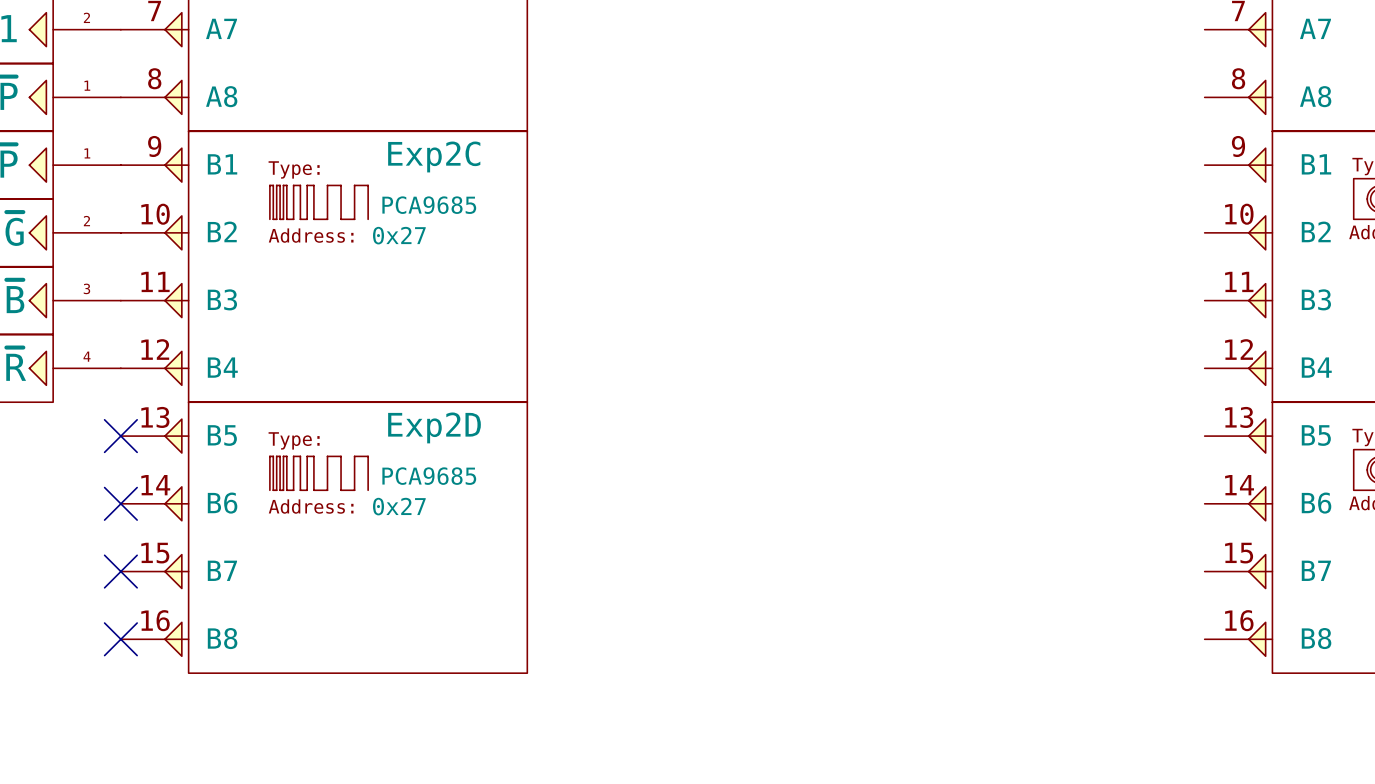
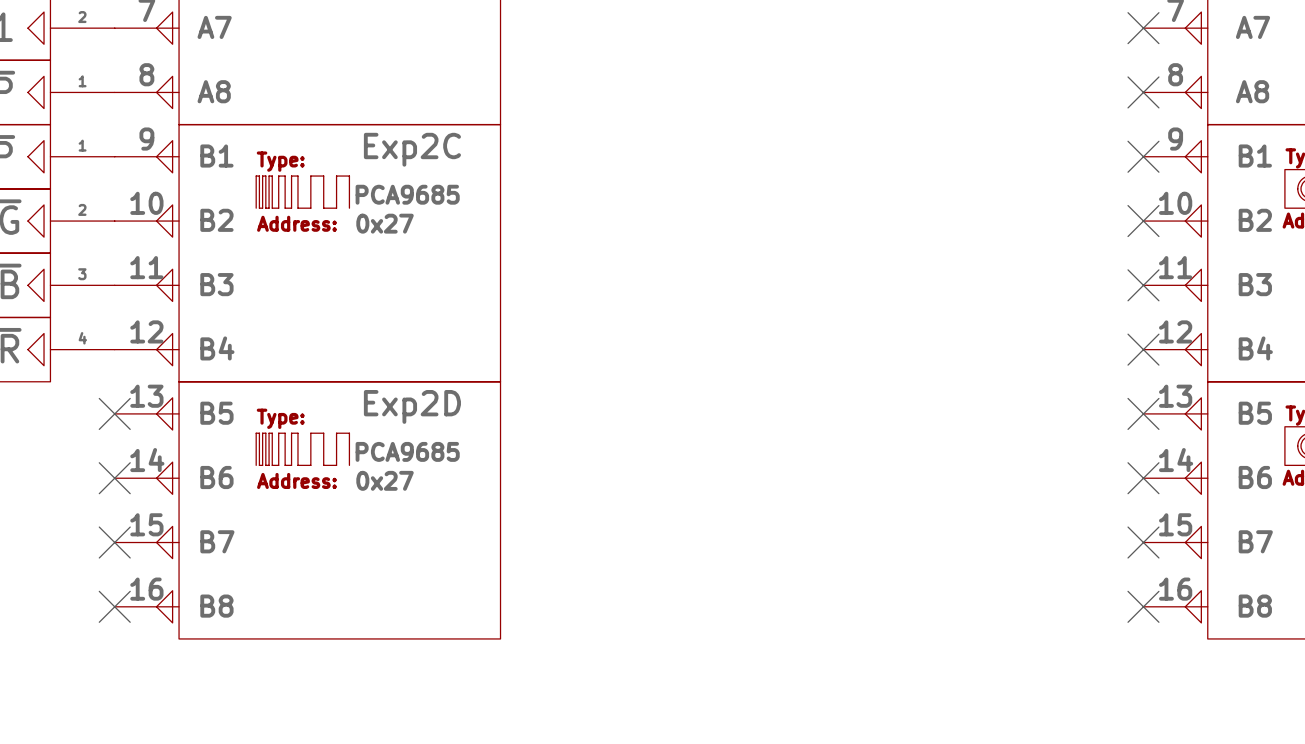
no-connect mark: none -> (1143, 28)
no-connect mark: none -> (1143, 92)
no-connect mark: none -> (1143, 156)
no-connect mark: none -> (1143, 221)
no-connect mark: none -> (1143, 285)
no-connect mark: none -> (1143, 349)
no-connect mark: none -> (1143, 413)
no-connect mark: none -> (1143, 478)
no-connect mark: none -> (1143, 542)
no-connect mark: none -> (1143, 606)

